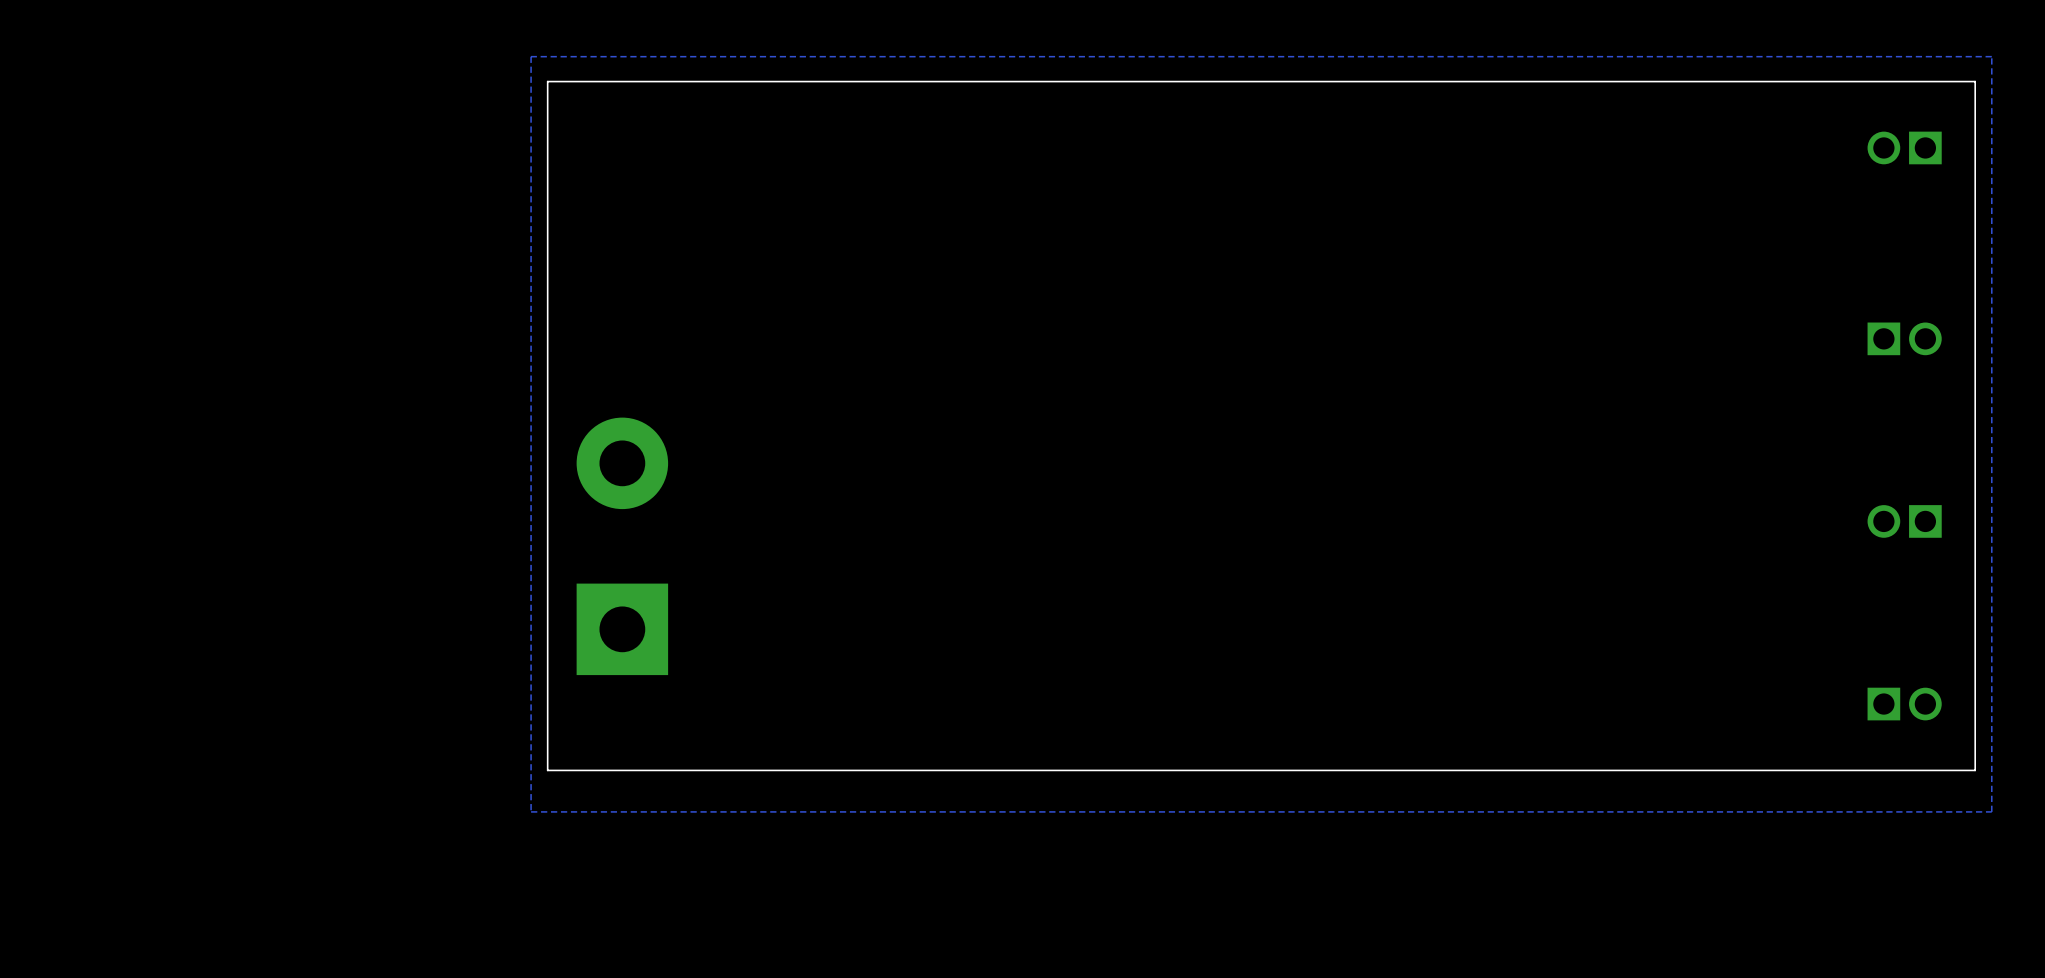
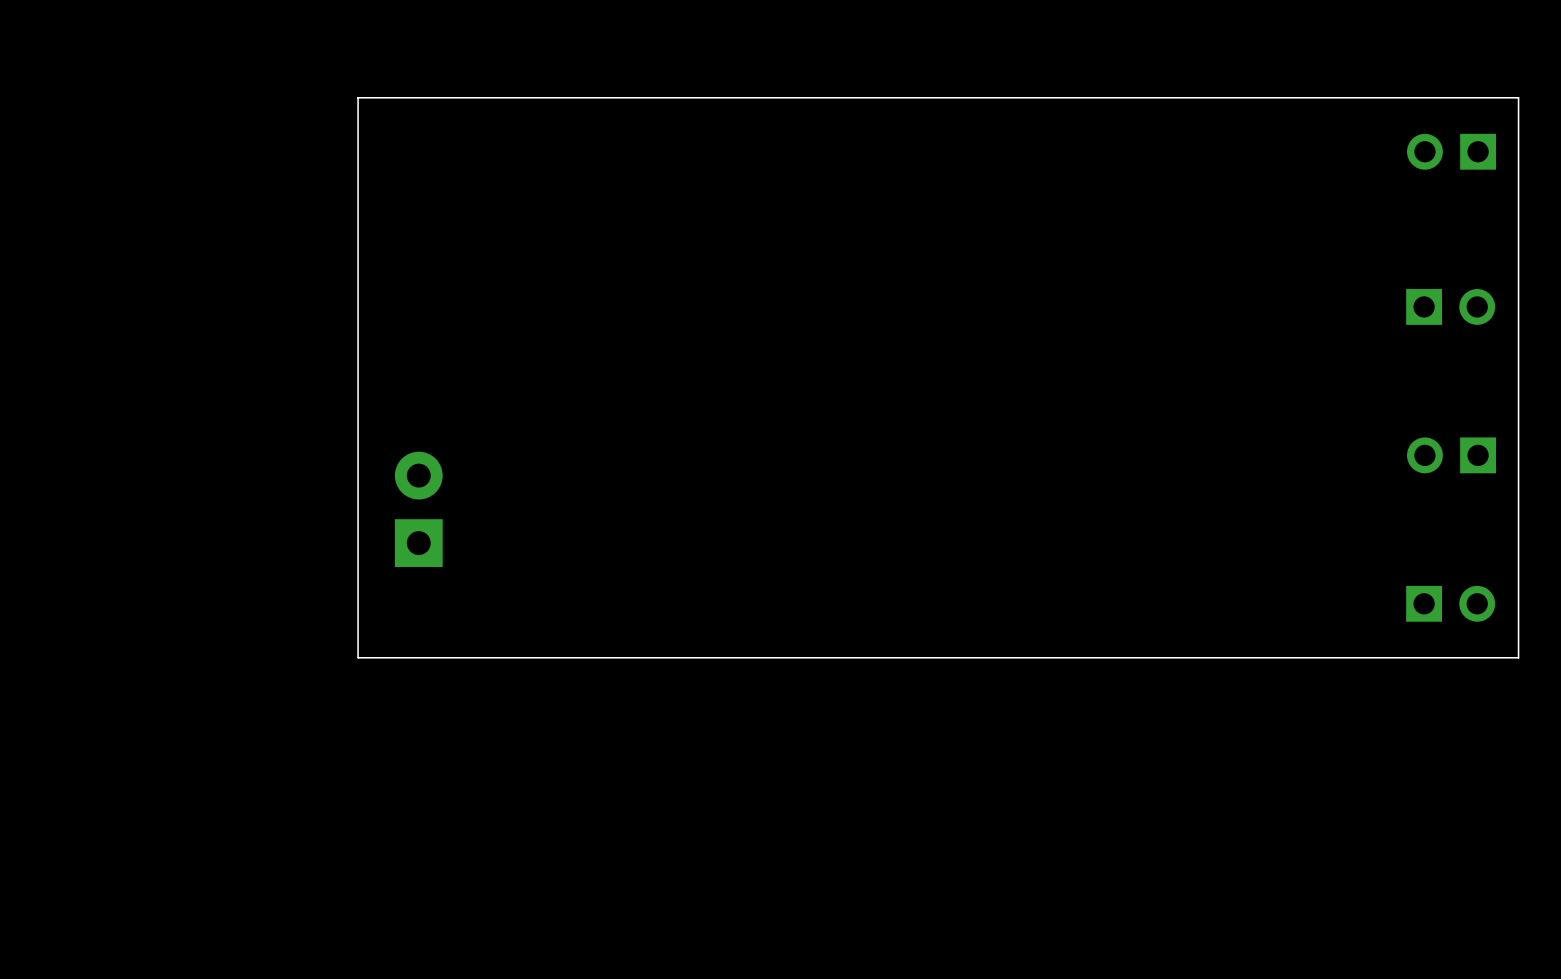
zone outline: (1991, 56) (1991, 811) (531, 811) (531, 56) (1991, 56) -> none
part footprint: [1867, 131, 1942, 165] -> [1407, 133, 1497, 170]
part footprint: [1867, 322, 1942, 356] -> [1406, 289, 1496, 325]
part footprint: [1867, 505, 1942, 538] -> [1407, 437, 1497, 474]
part: (622, 546) -> none
part: none -> (418, 509)
part footprint: [1867, 687, 1942, 721] -> [1406, 585, 1496, 622]

